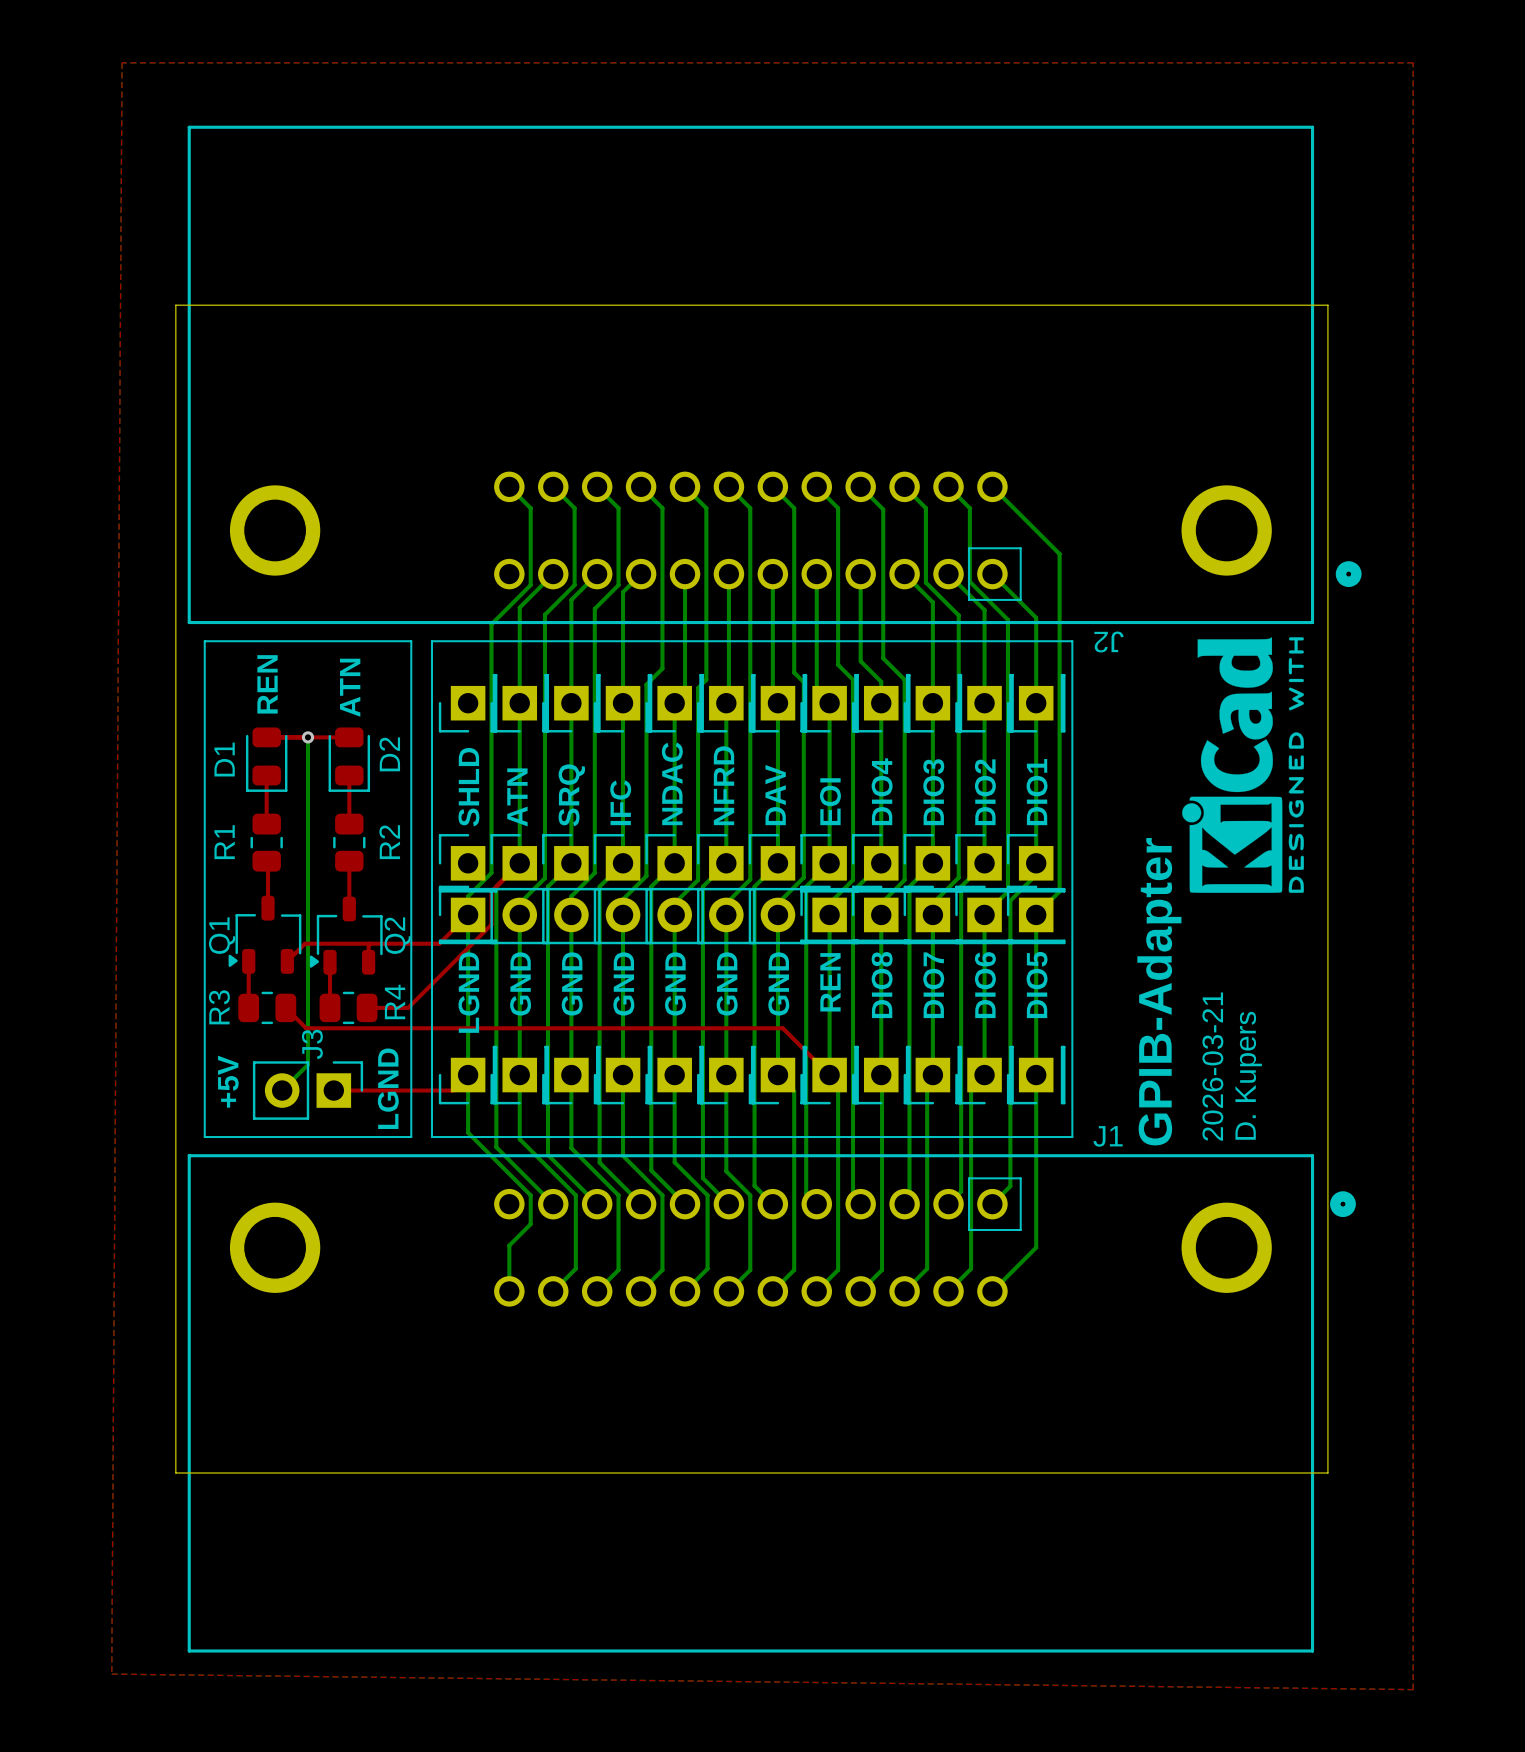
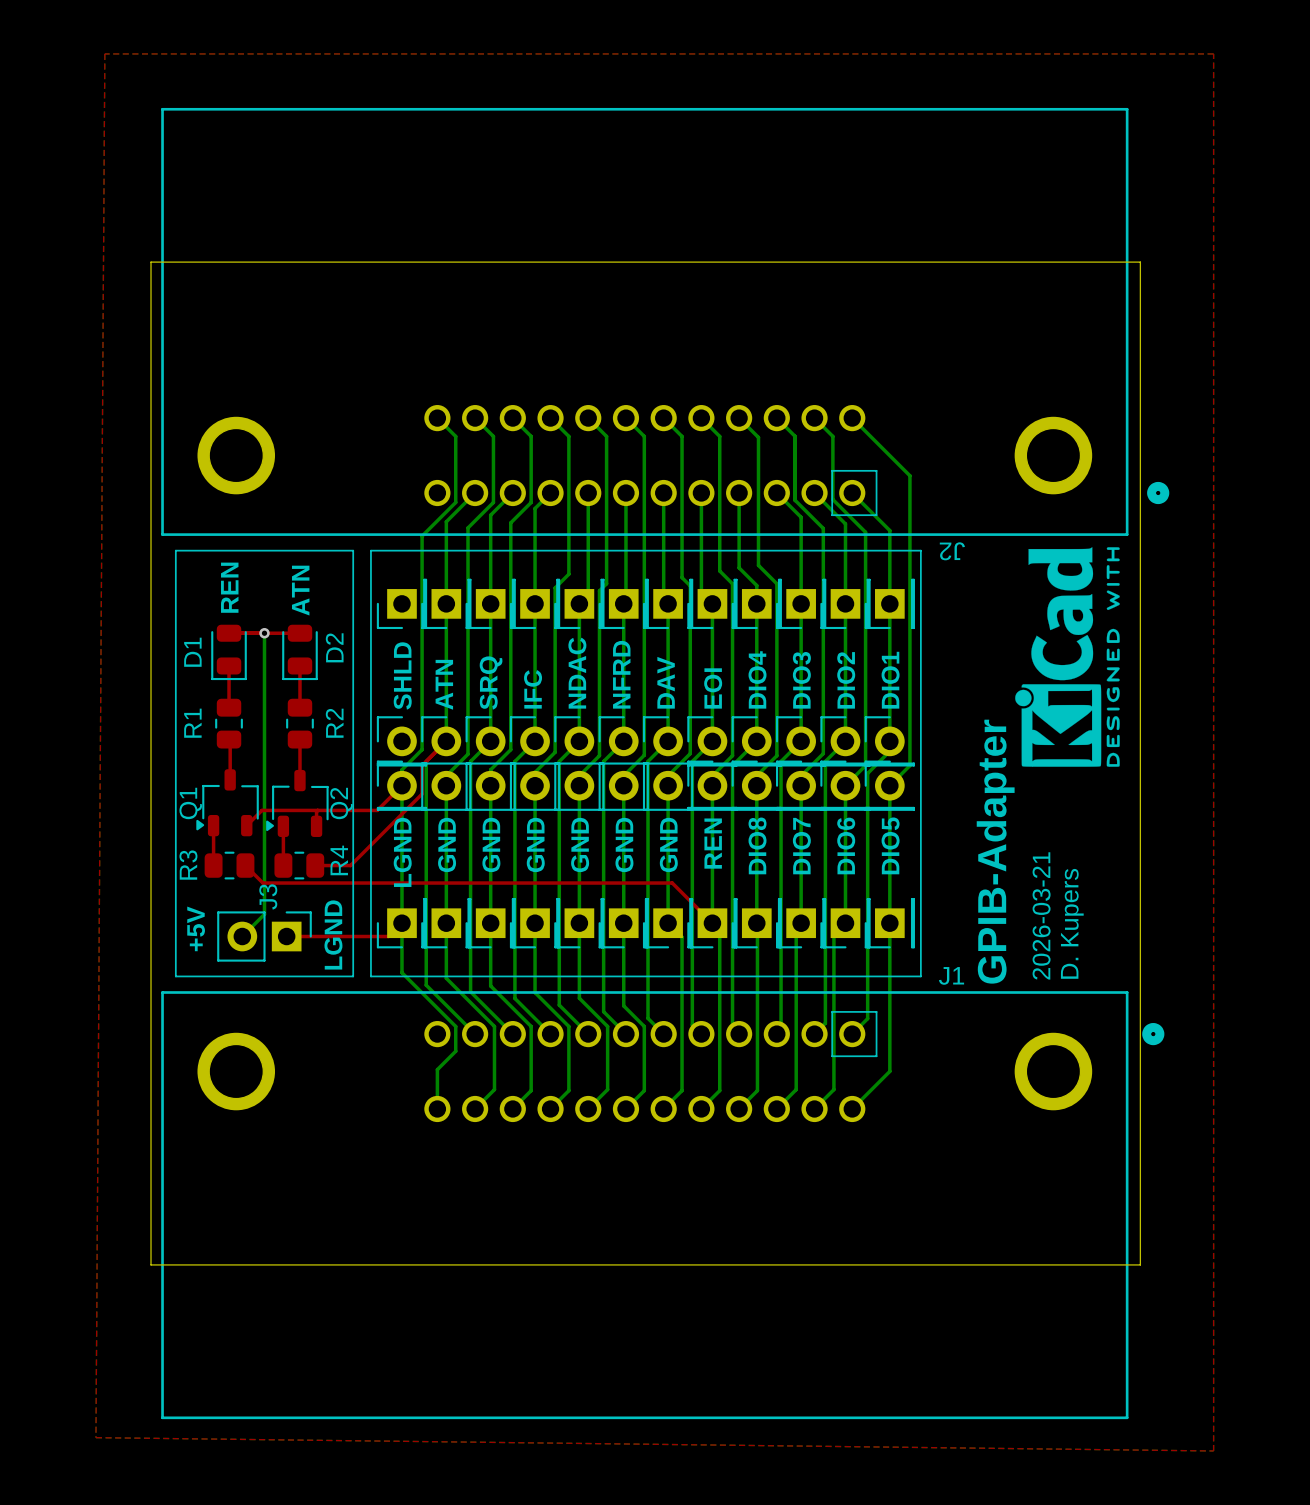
part footprint: [438, 834, 498, 893] -> [376, 716, 428, 767]
part footprint: [490, 834, 550, 945] -> [421, 716, 472, 811]
part footprint: [542, 834, 601, 945] -> [465, 716, 516, 811]
part footprint: [593, 834, 653, 945] -> [509, 716, 561, 811]
part footprint: [645, 834, 704, 945] -> [554, 716, 605, 811]
part footprint: [697, 834, 756, 945] -> [598, 716, 649, 811]
part footprint: [748, 834, 808, 945] -> [642, 716, 694, 811]
part footprint: [800, 834, 859, 893] -> [687, 716, 738, 767]
part footprint: [851, 834, 911, 893] -> [731, 716, 782, 767]
part footprint: [903, 834, 963, 893] -> [776, 716, 827, 767]
part footprint: [955, 834, 1014, 893] -> [820, 716, 871, 767]
part footprint: [1006, 834, 1066, 893] -> [864, 716, 915, 767]
part footprint: [438, 885, 498, 945] -> [376, 760, 428, 811]
part footprint: [800, 885, 859, 945] -> [687, 760, 738, 811]
part footprint: [851, 885, 911, 945] -> [731, 760, 782, 811]
part footprint: [903, 885, 963, 945] -> [776, 760, 827, 811]
part footprint: [955, 885, 1014, 945] -> [820, 760, 871, 811]
part footprint: [1006, 885, 1066, 945] -> [864, 760, 915, 811]

